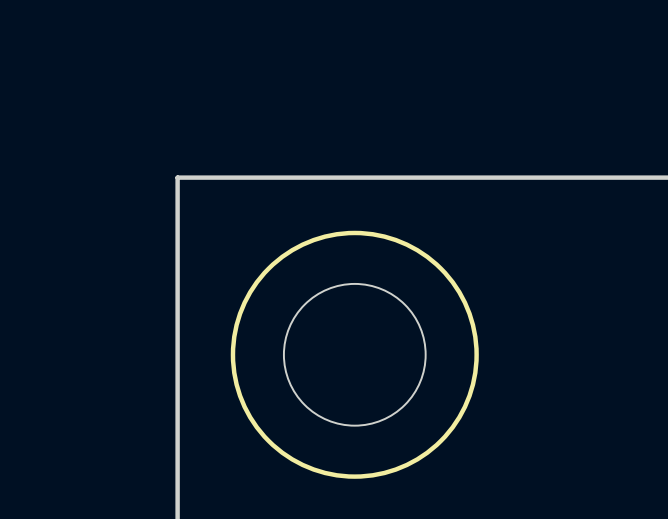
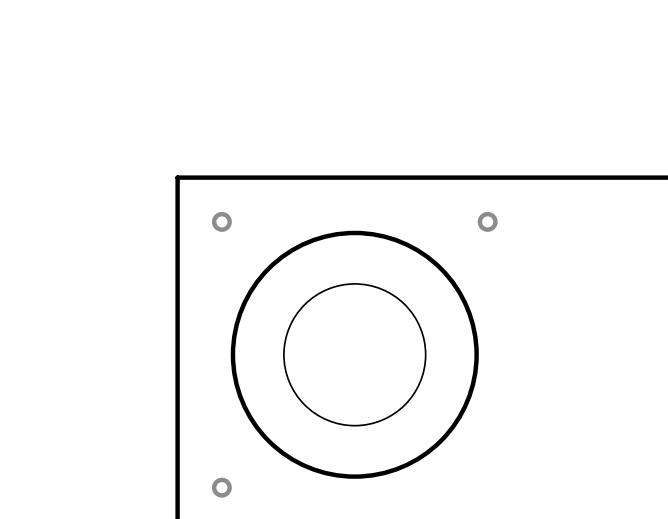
via: none -> (221, 221)
via: none -> (487, 221)
via: none -> (221, 487)

